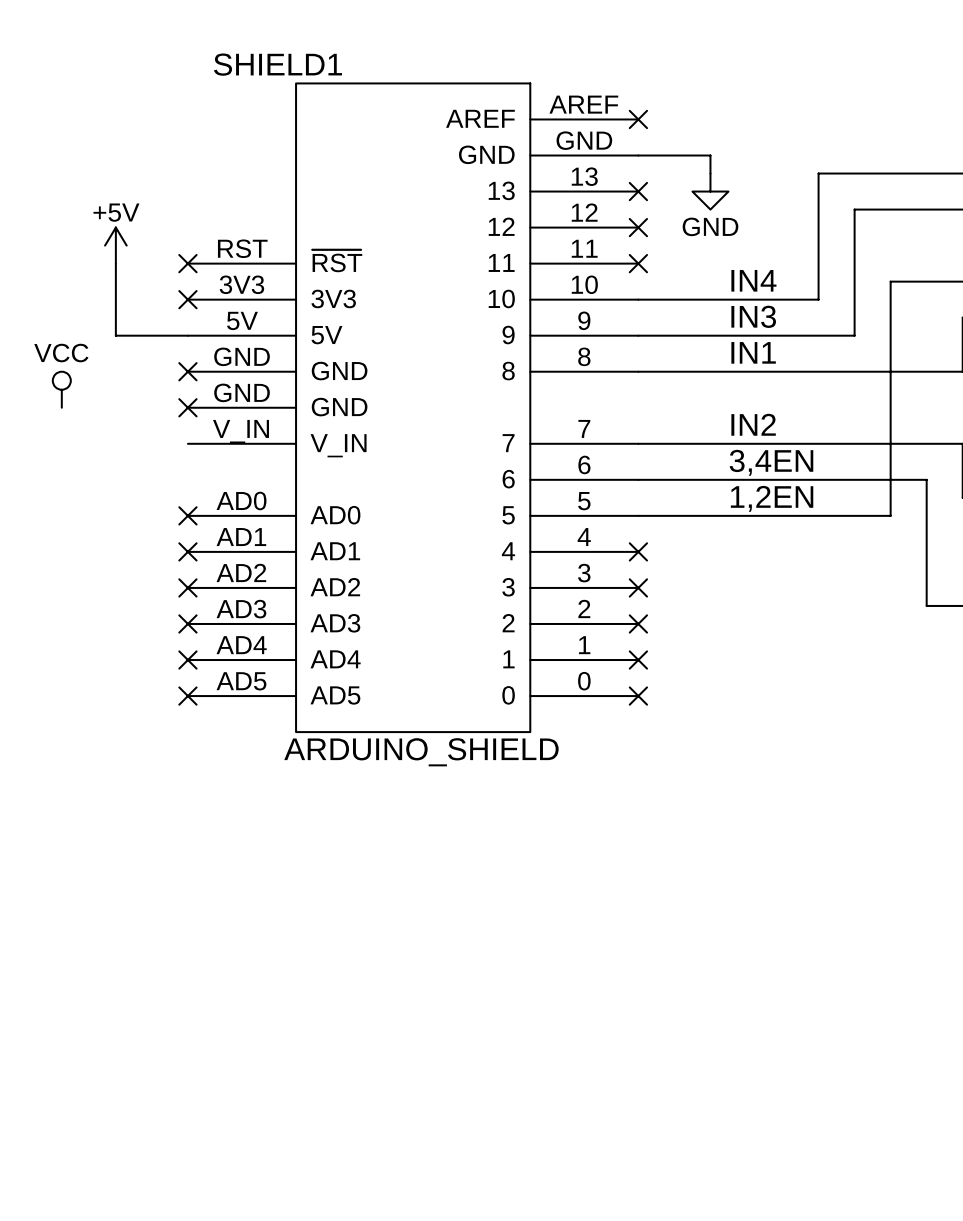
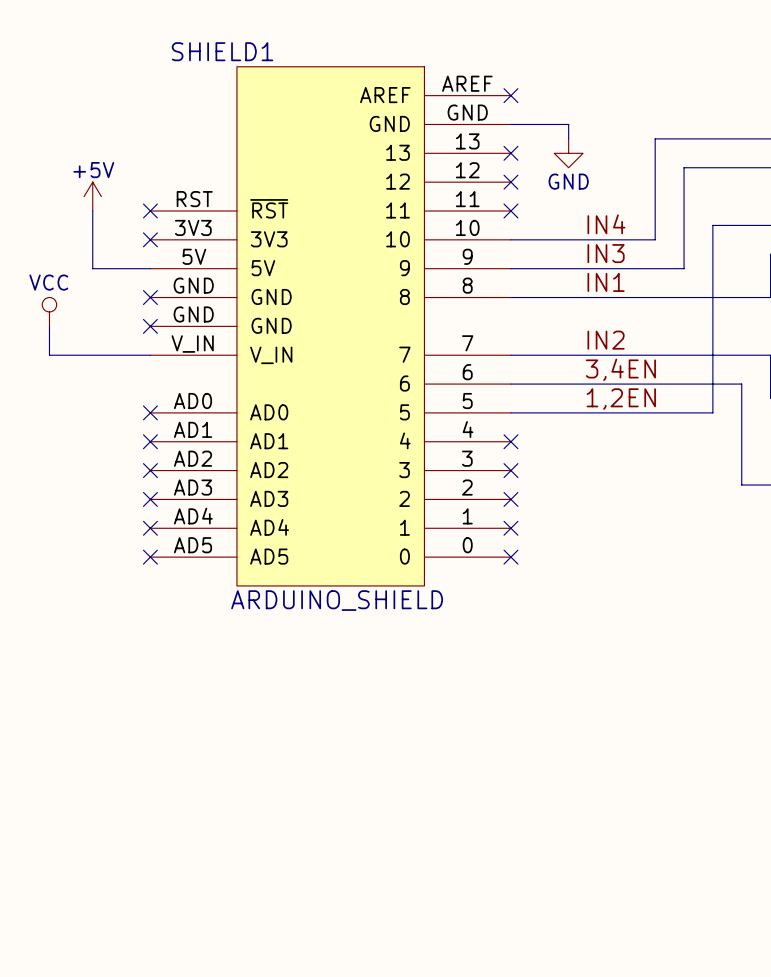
wire: none -> (49, 326) (49, 355) (150, 355)

